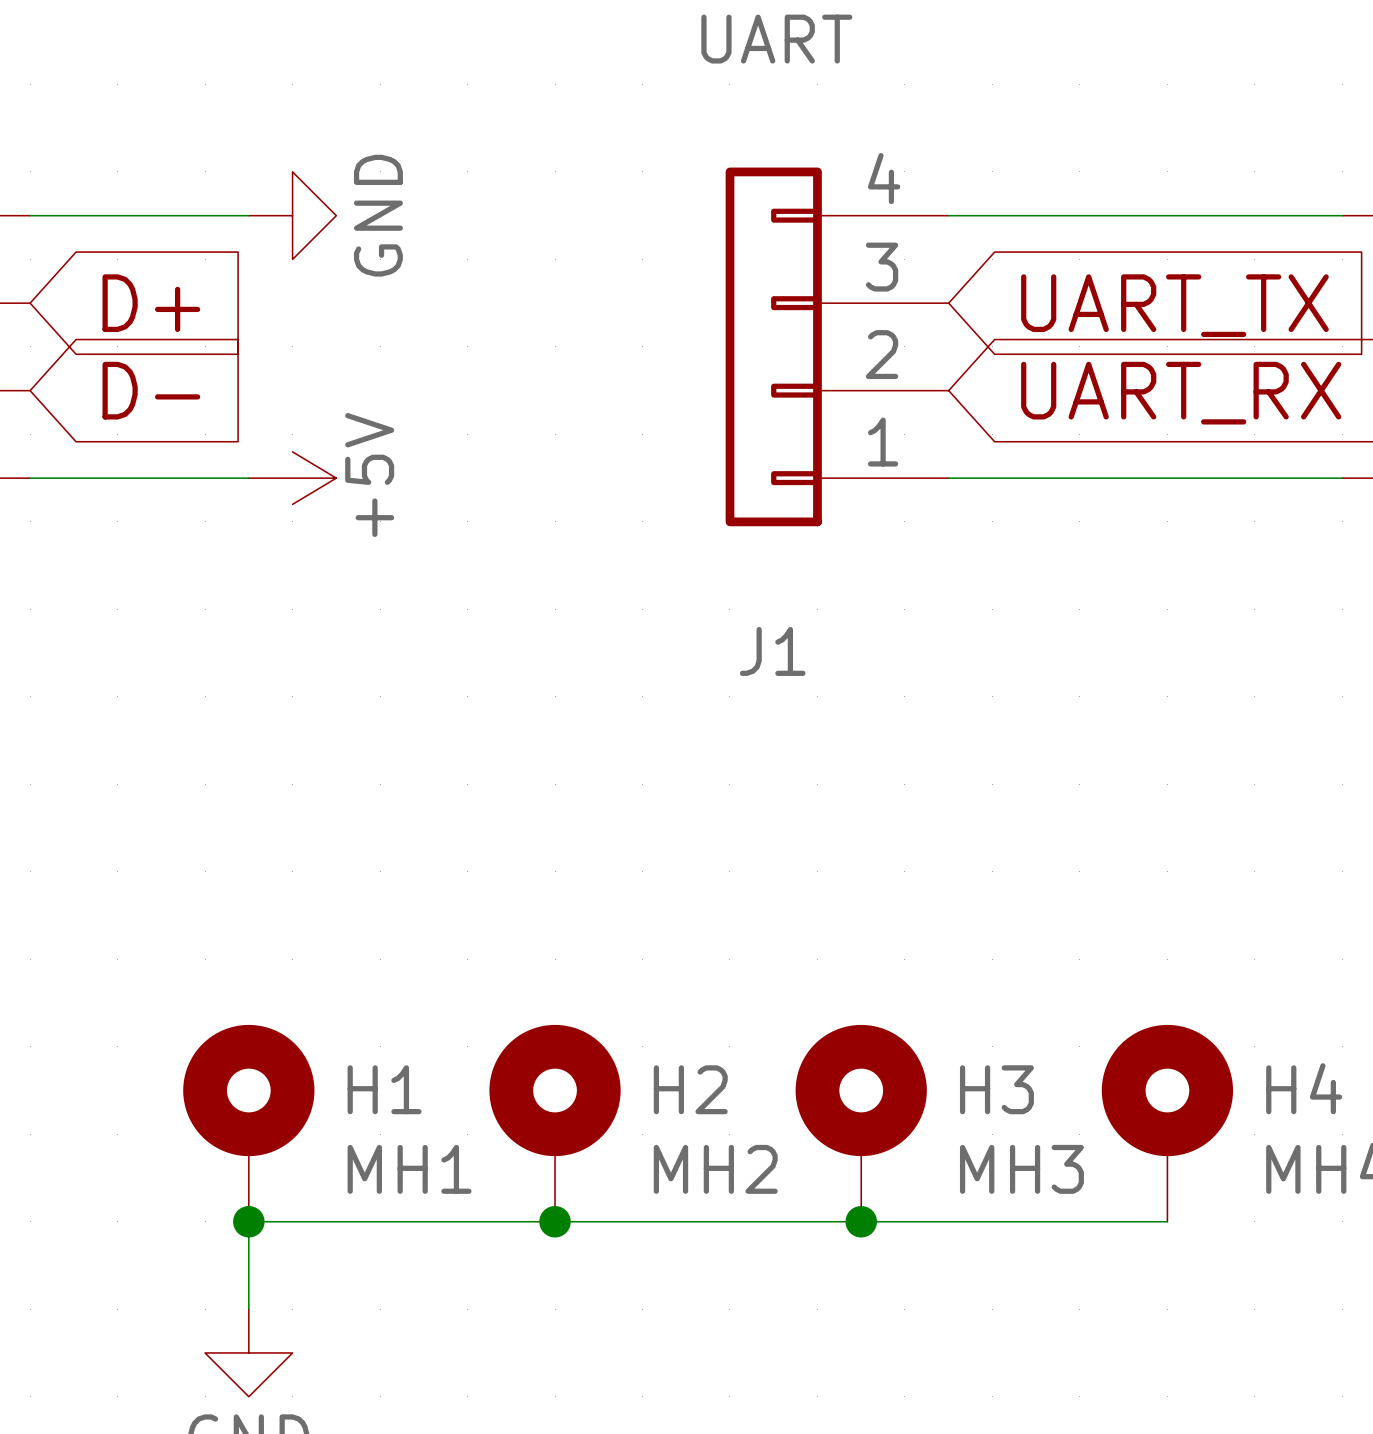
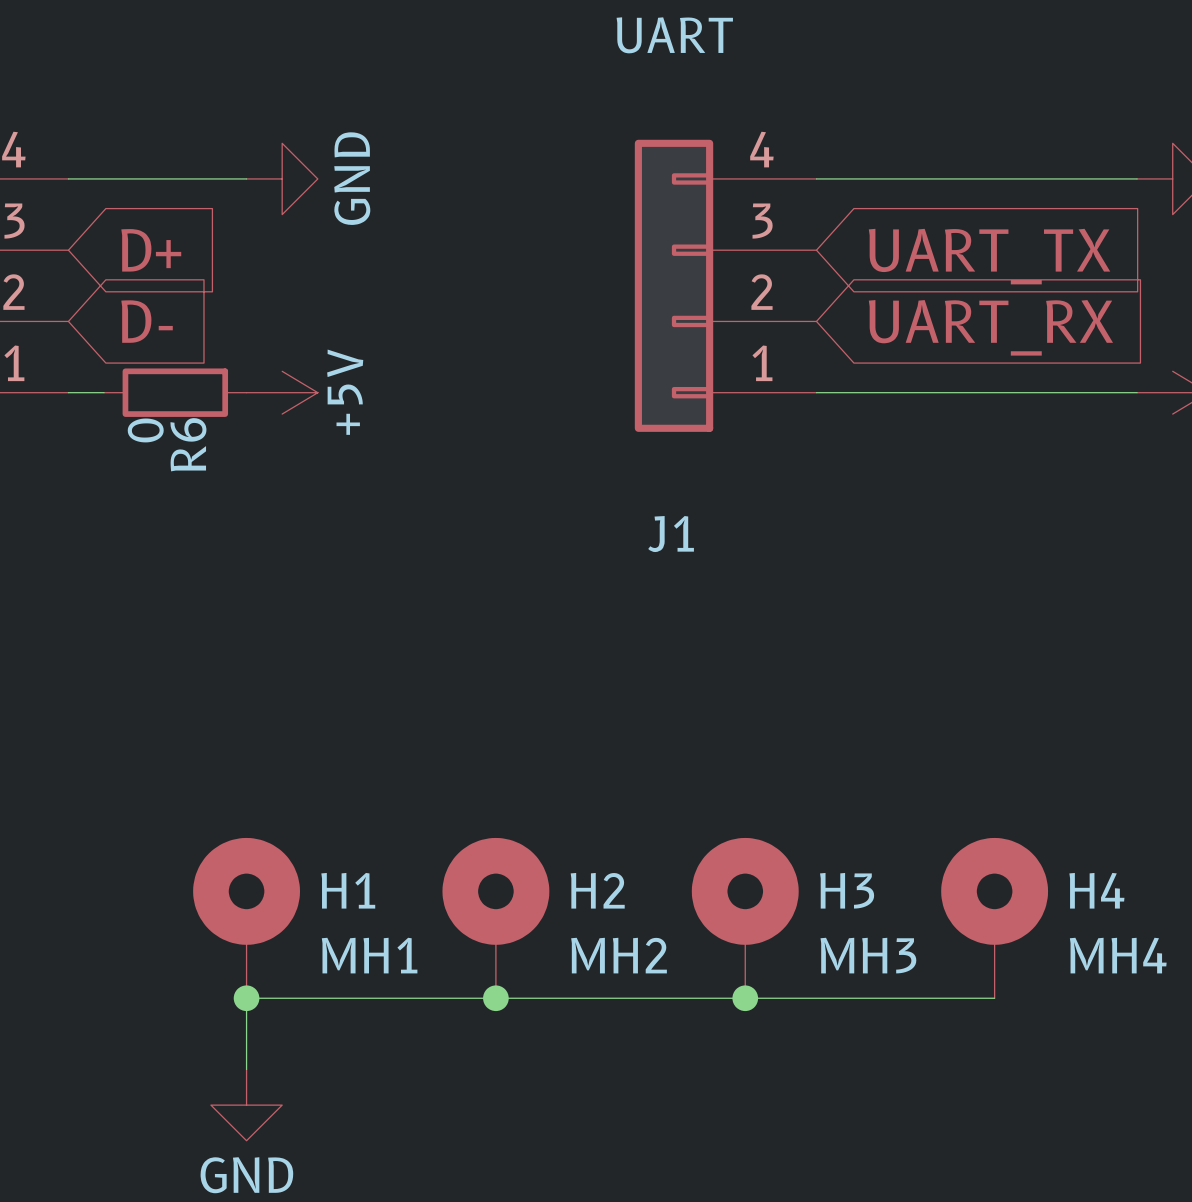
wire: (73, 478) (248, 478) -> none
R6: none -> 0 (175, 392)

